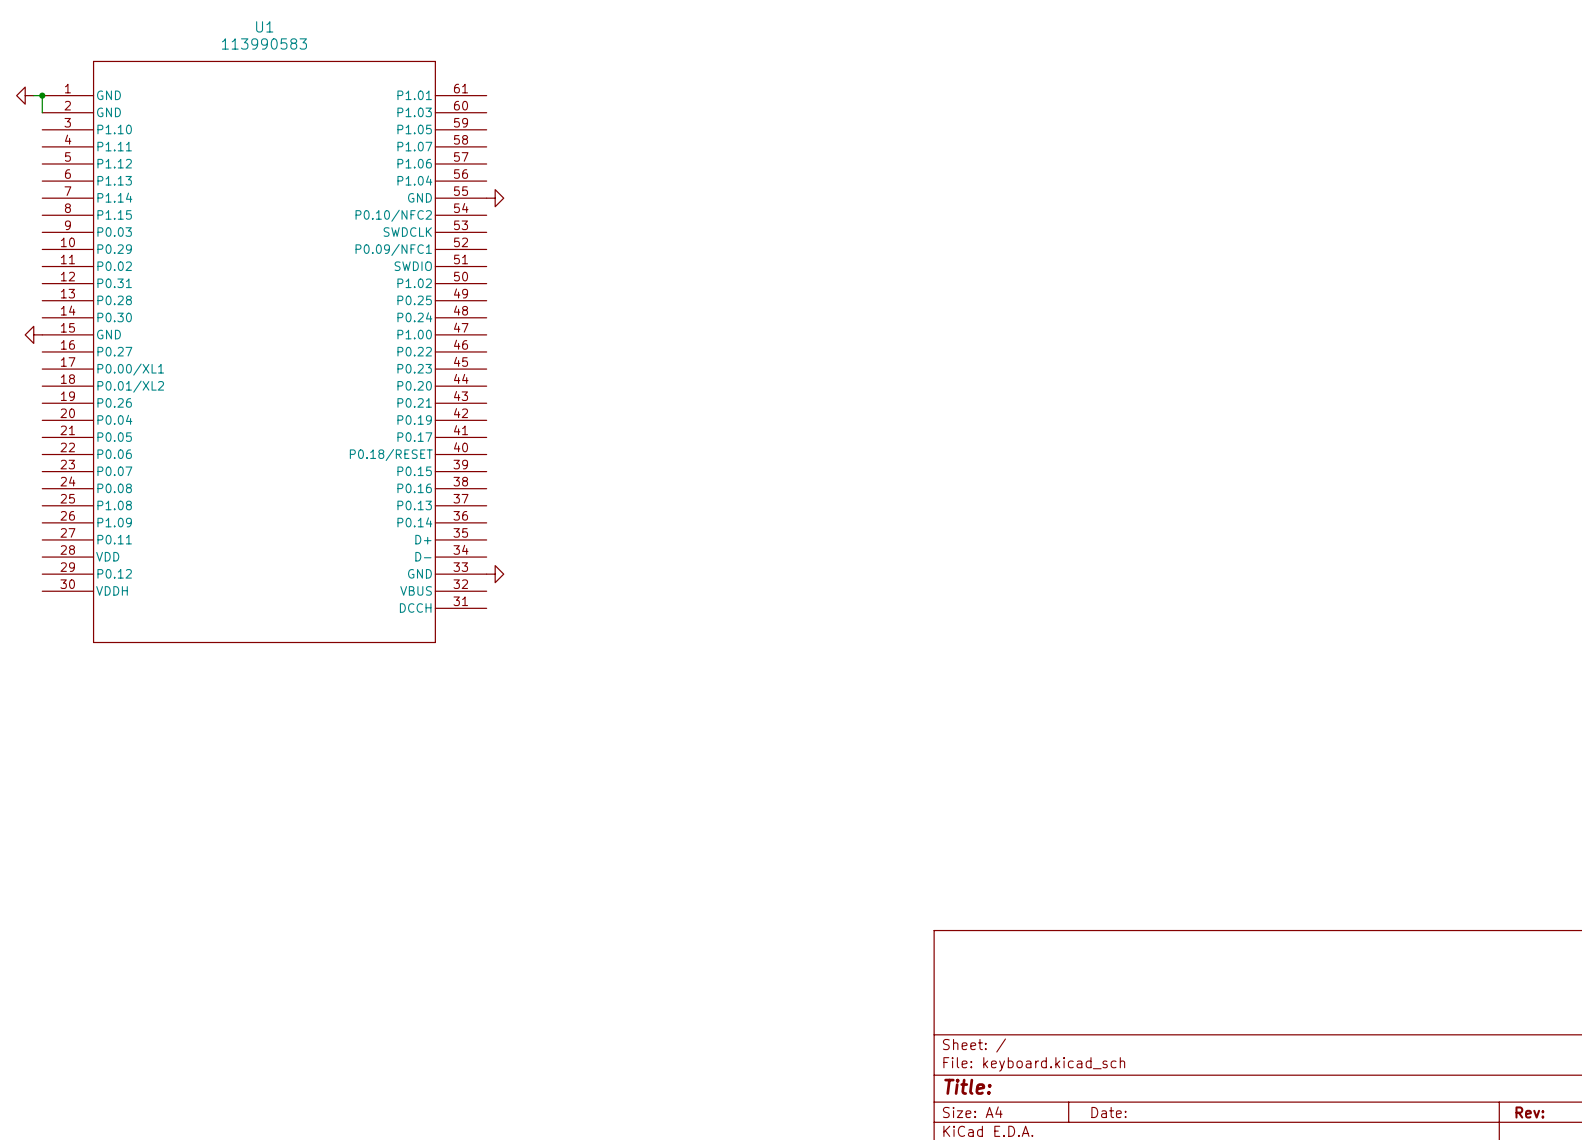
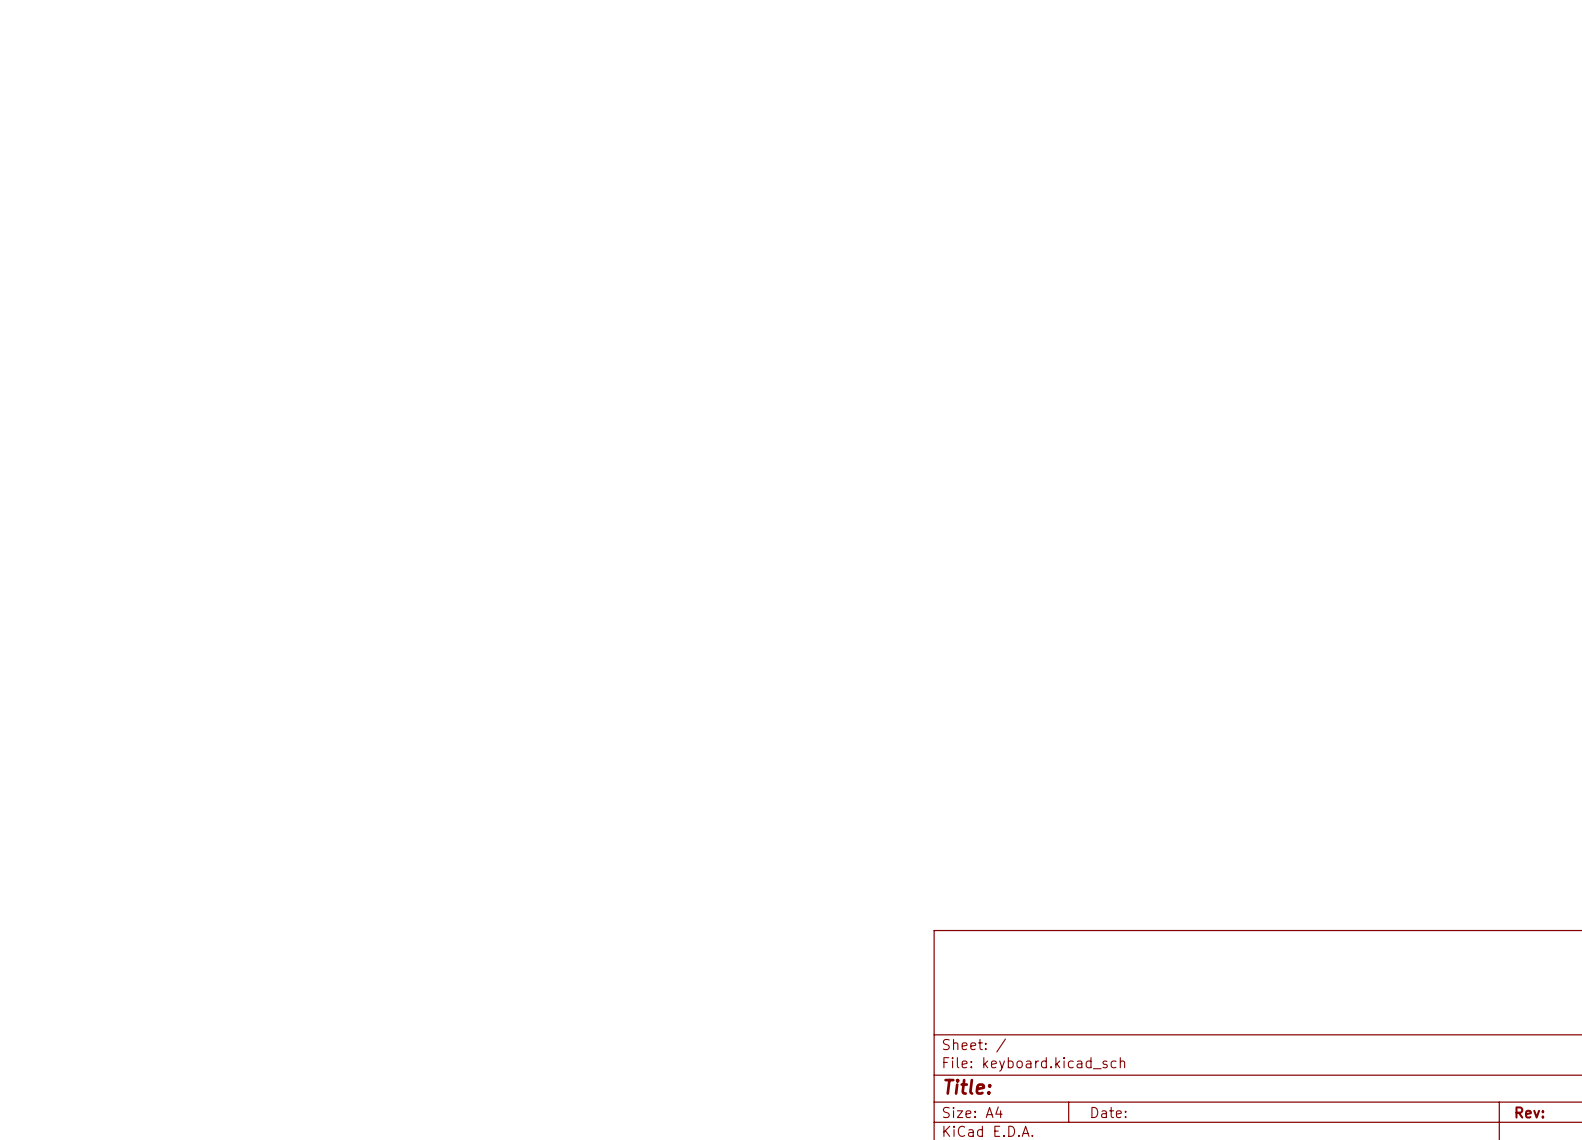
power symbol: (25, 95) -> none
wire: (33, 95) (42, 95) (42, 112) -> none
junction: (42, 95) -> none
power symbol: (495, 198) -> none
power symbol: (33, 334) -> none
U1: 113990583 (264, 351) -> none
power symbol: (495, 574) -> none

